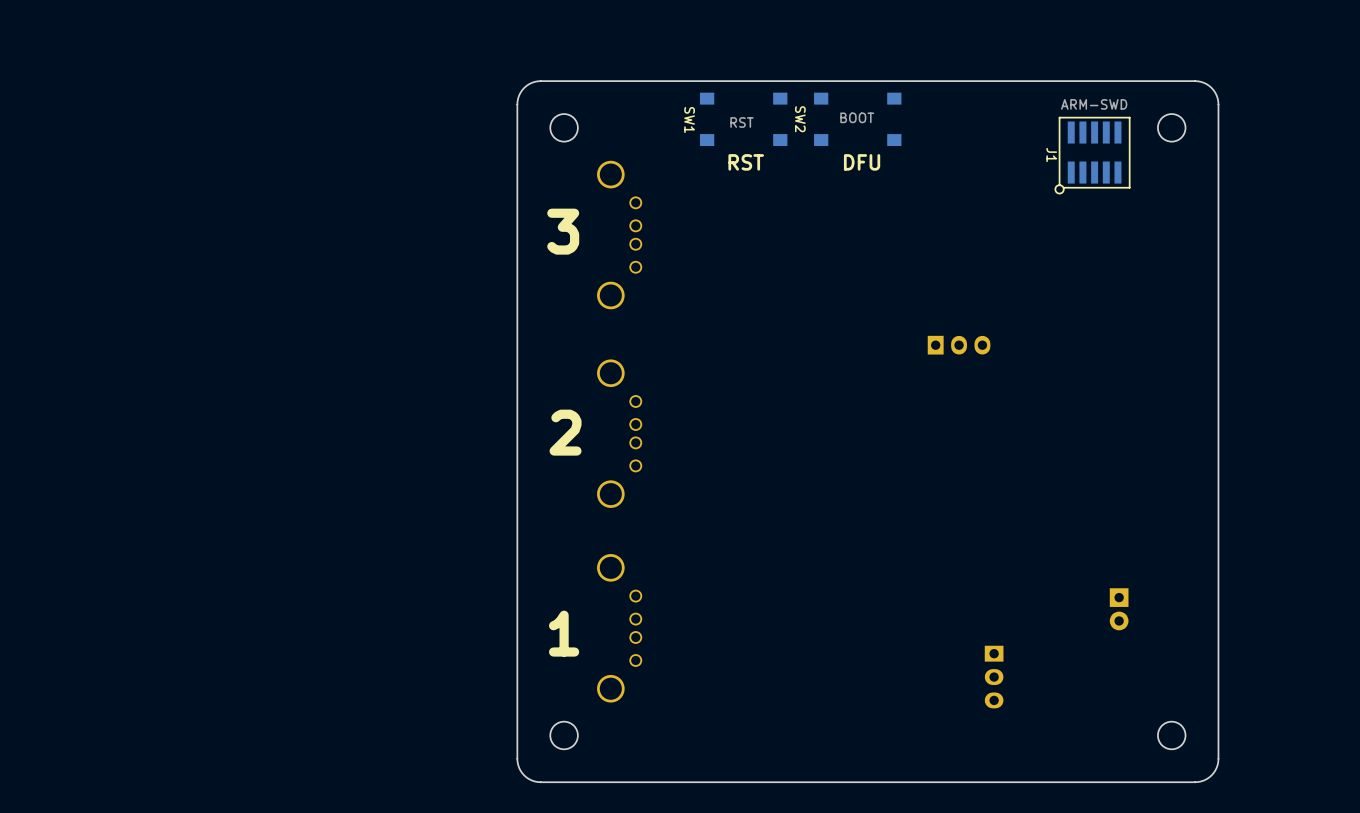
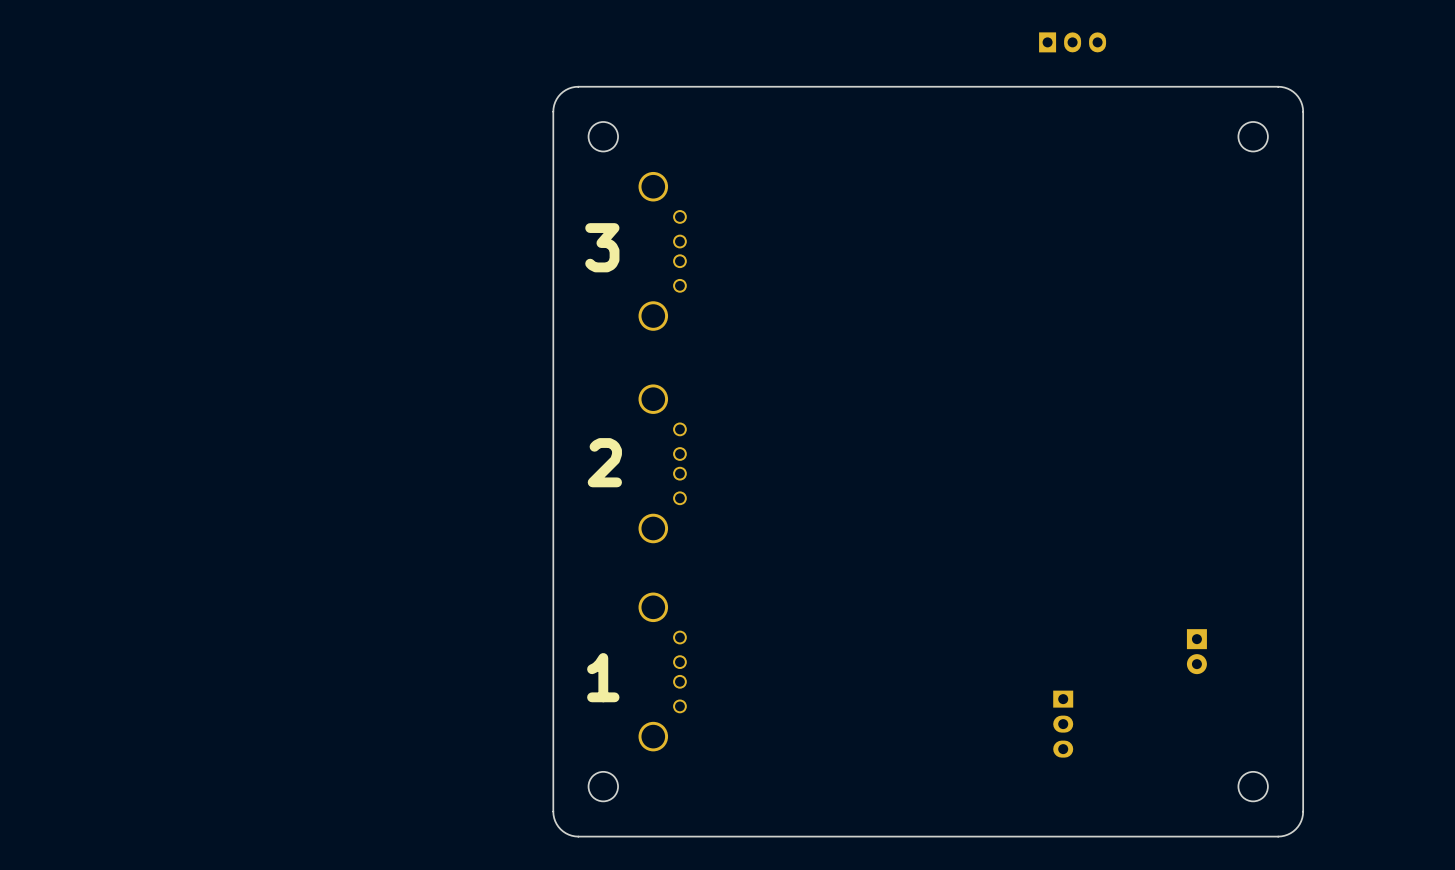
part: none -> (1072, 42)
SW1: RST (743, 119) -> none
SW2: BOOT (857, 119) -> none
J1: ARM-SWD (1092, 155) -> none
text: RST (746, 162) -> none
text: DFU (862, 162) -> none
part: (959, 345) -> none

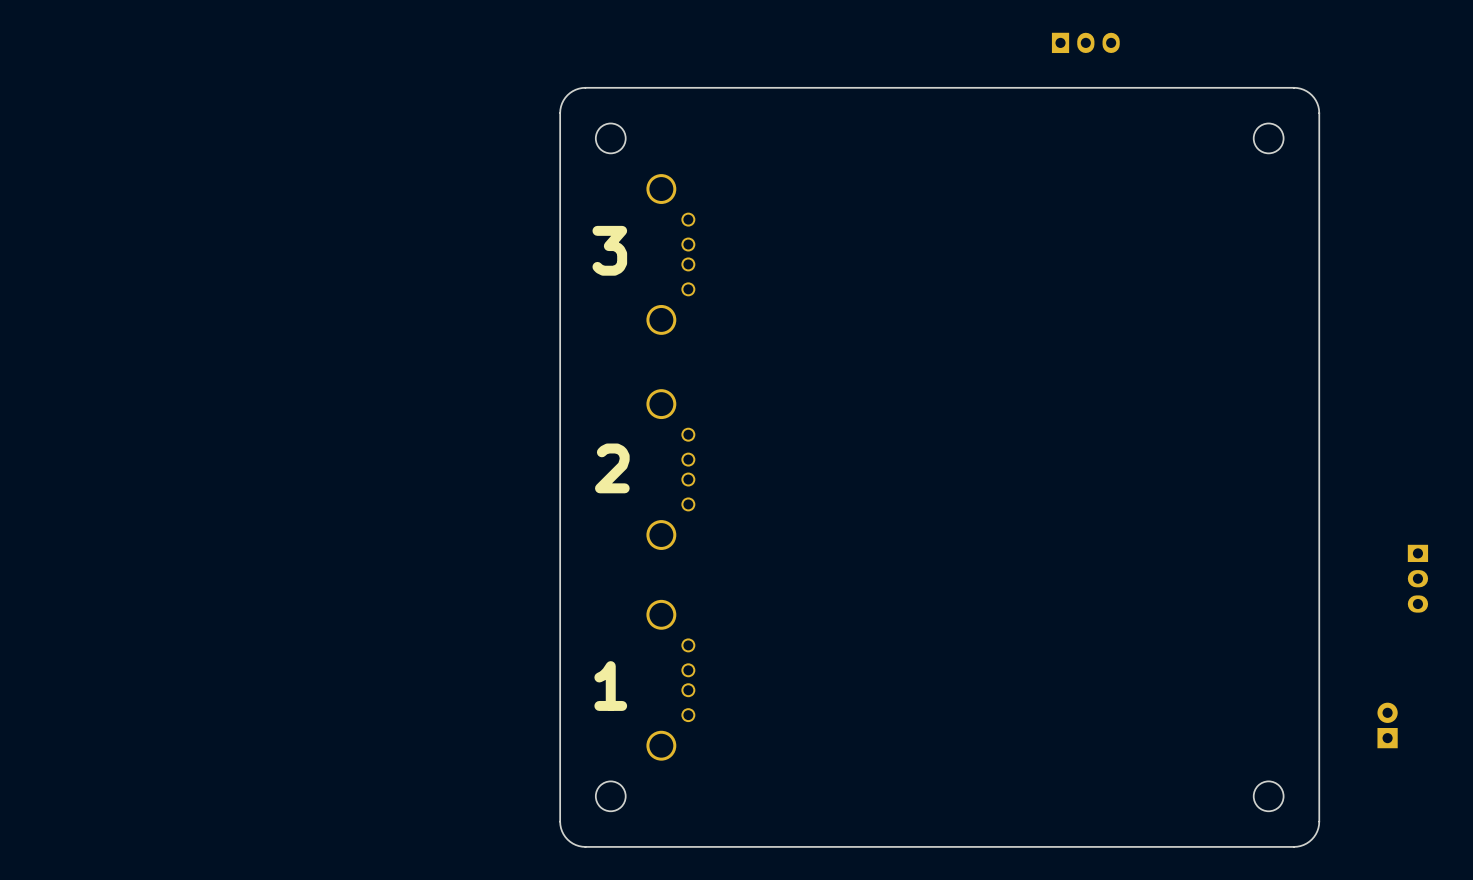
part: none -> (1417, 578)
part rotation: 0° (1196, 651) -> 180° (1387, 725)
part position: (1196, 651) -> (1387, 725)
part: (1063, 724) -> none

